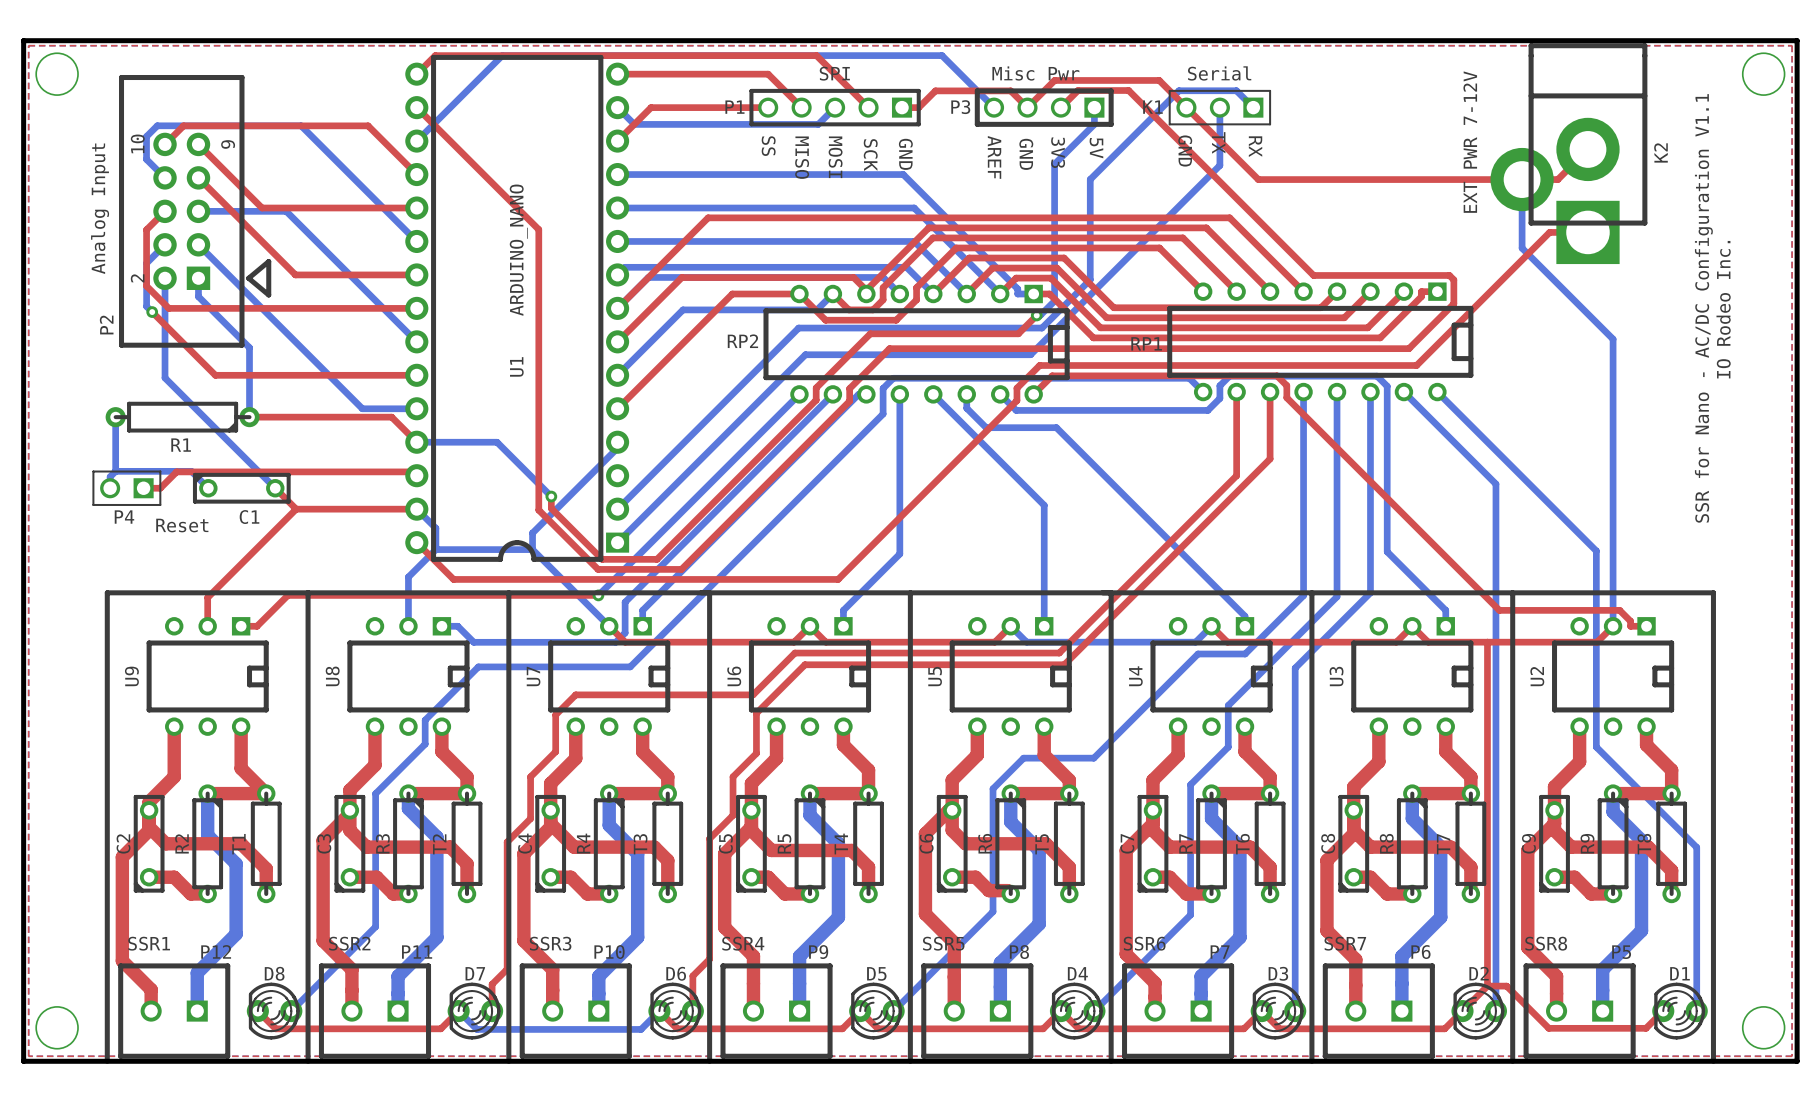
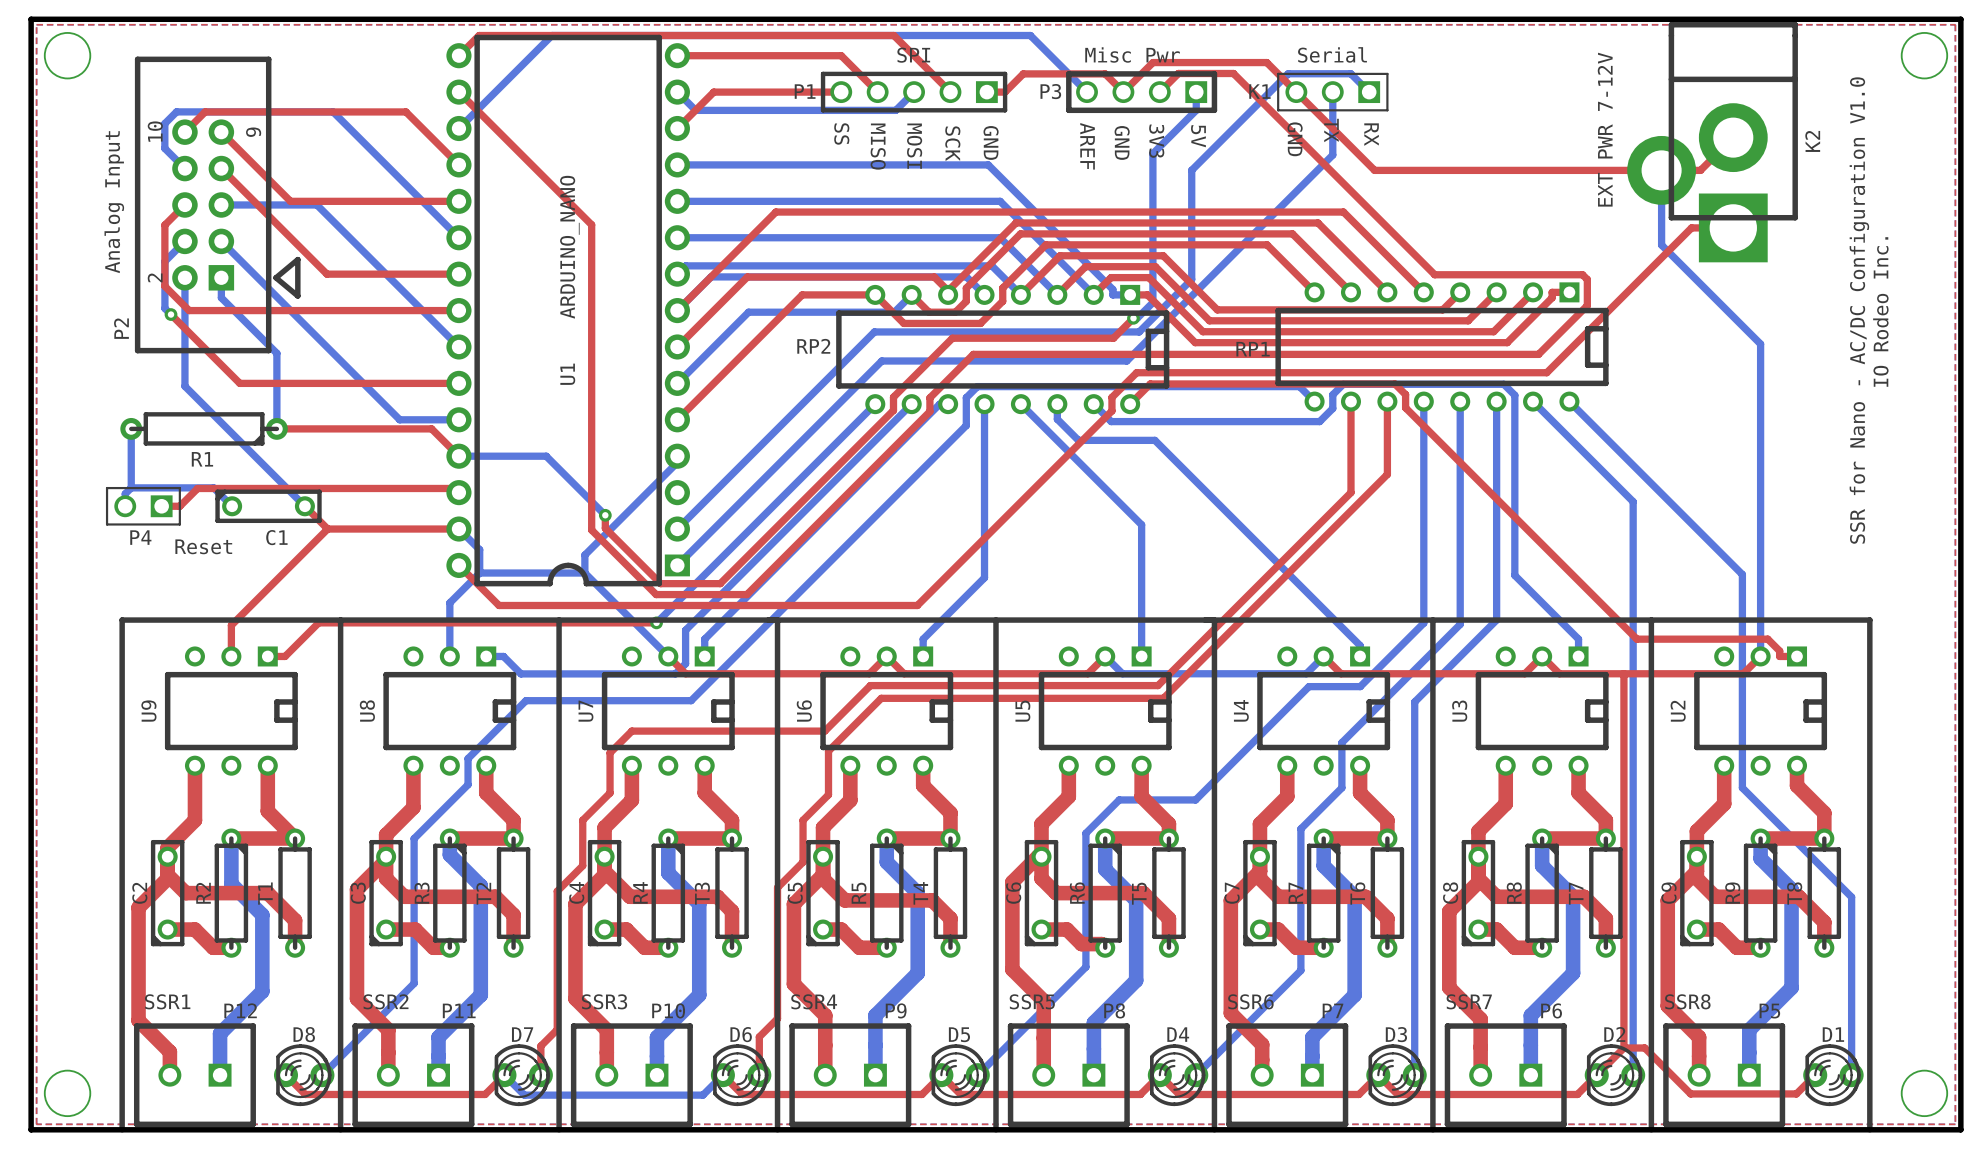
text: SSR for Nano - AC/DC Configuration V1.1 (1703, 308) -> SSR for Nano - AC/DC Configuration V1.0 (1859, 310)

